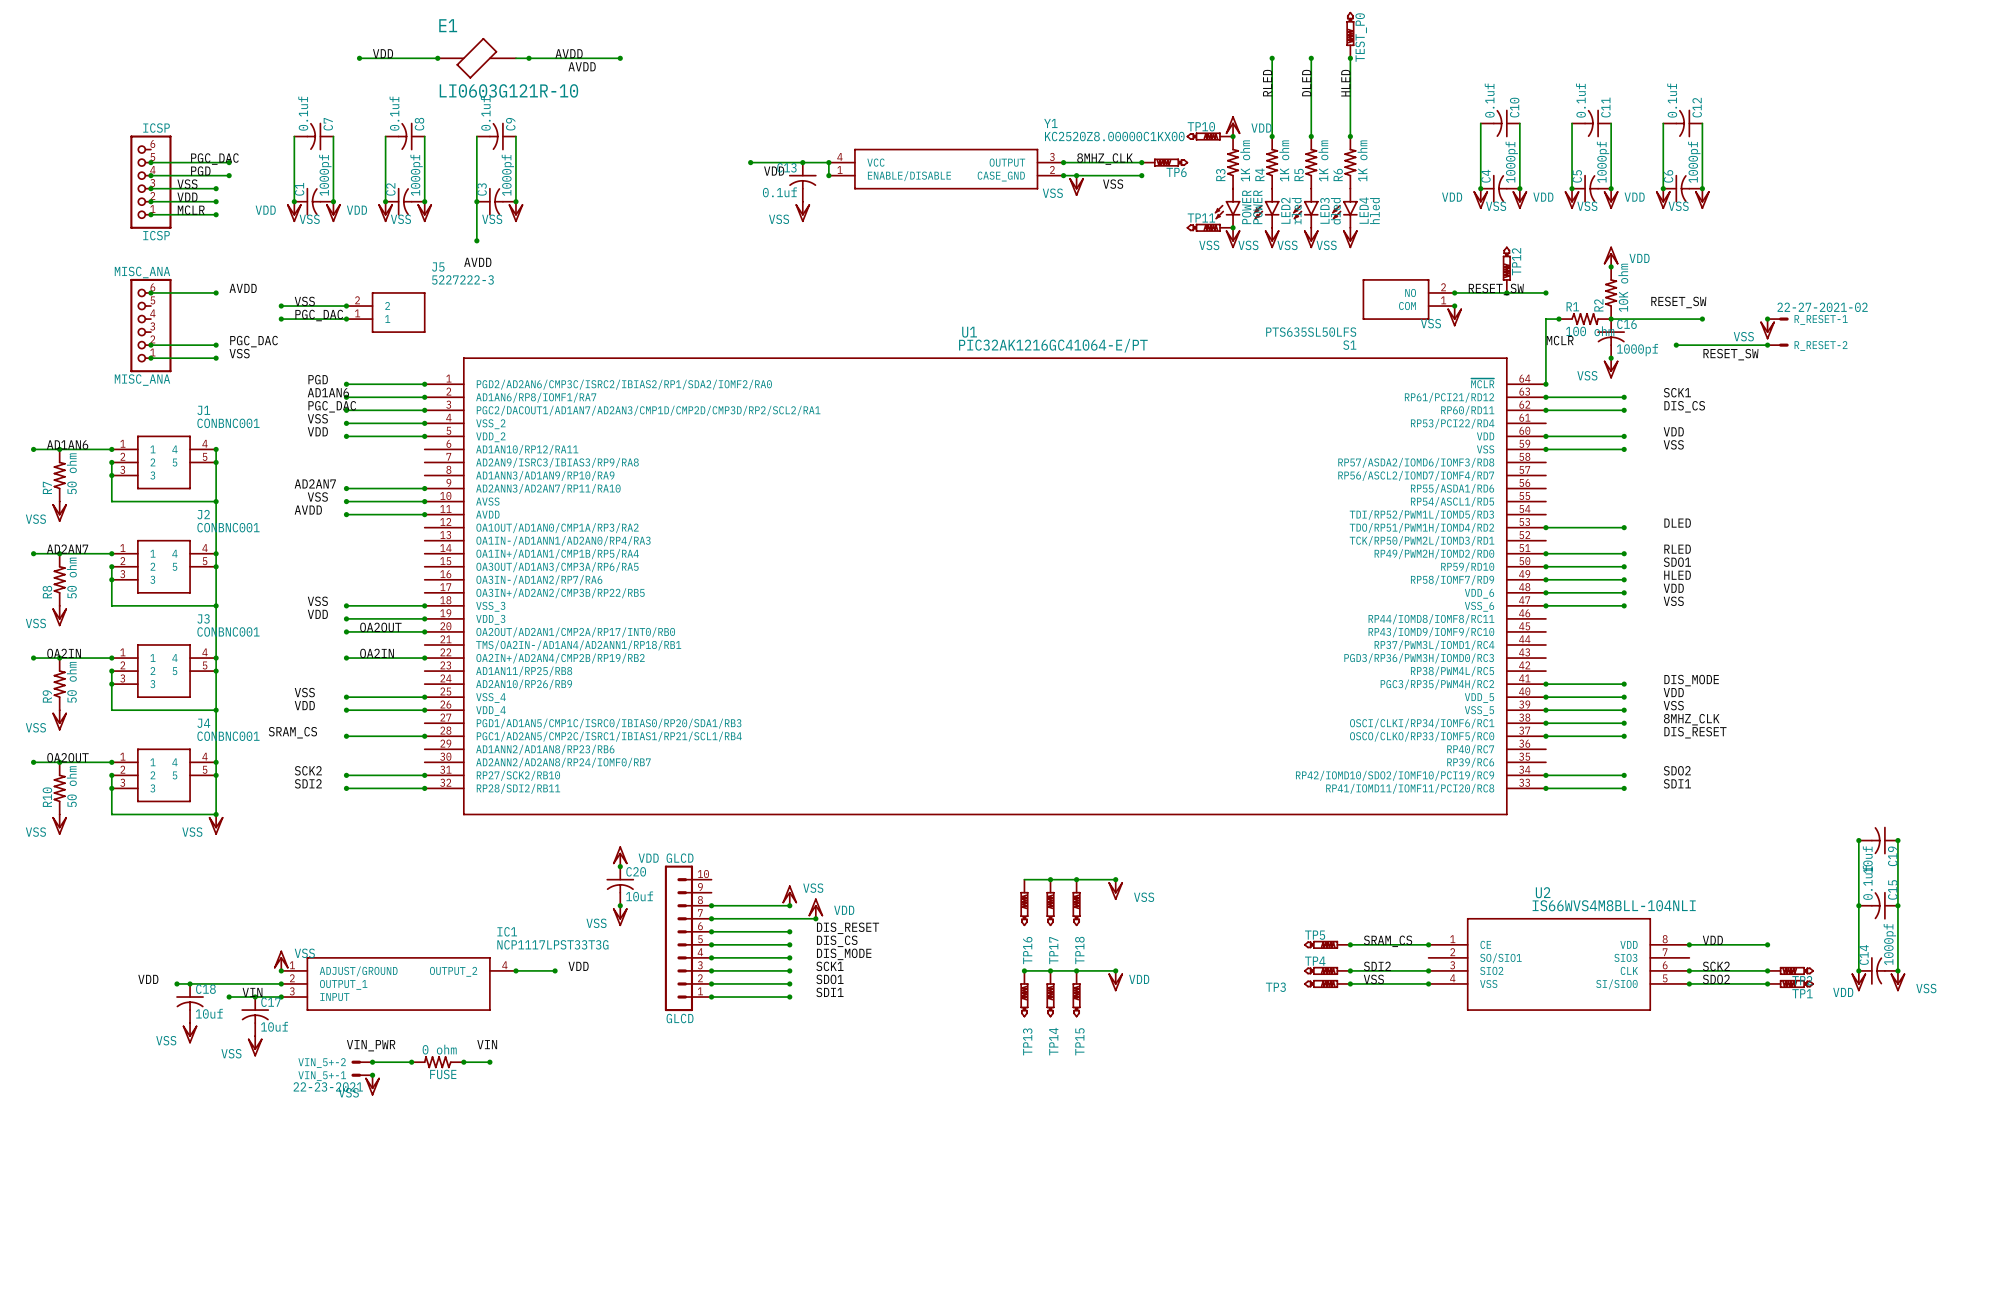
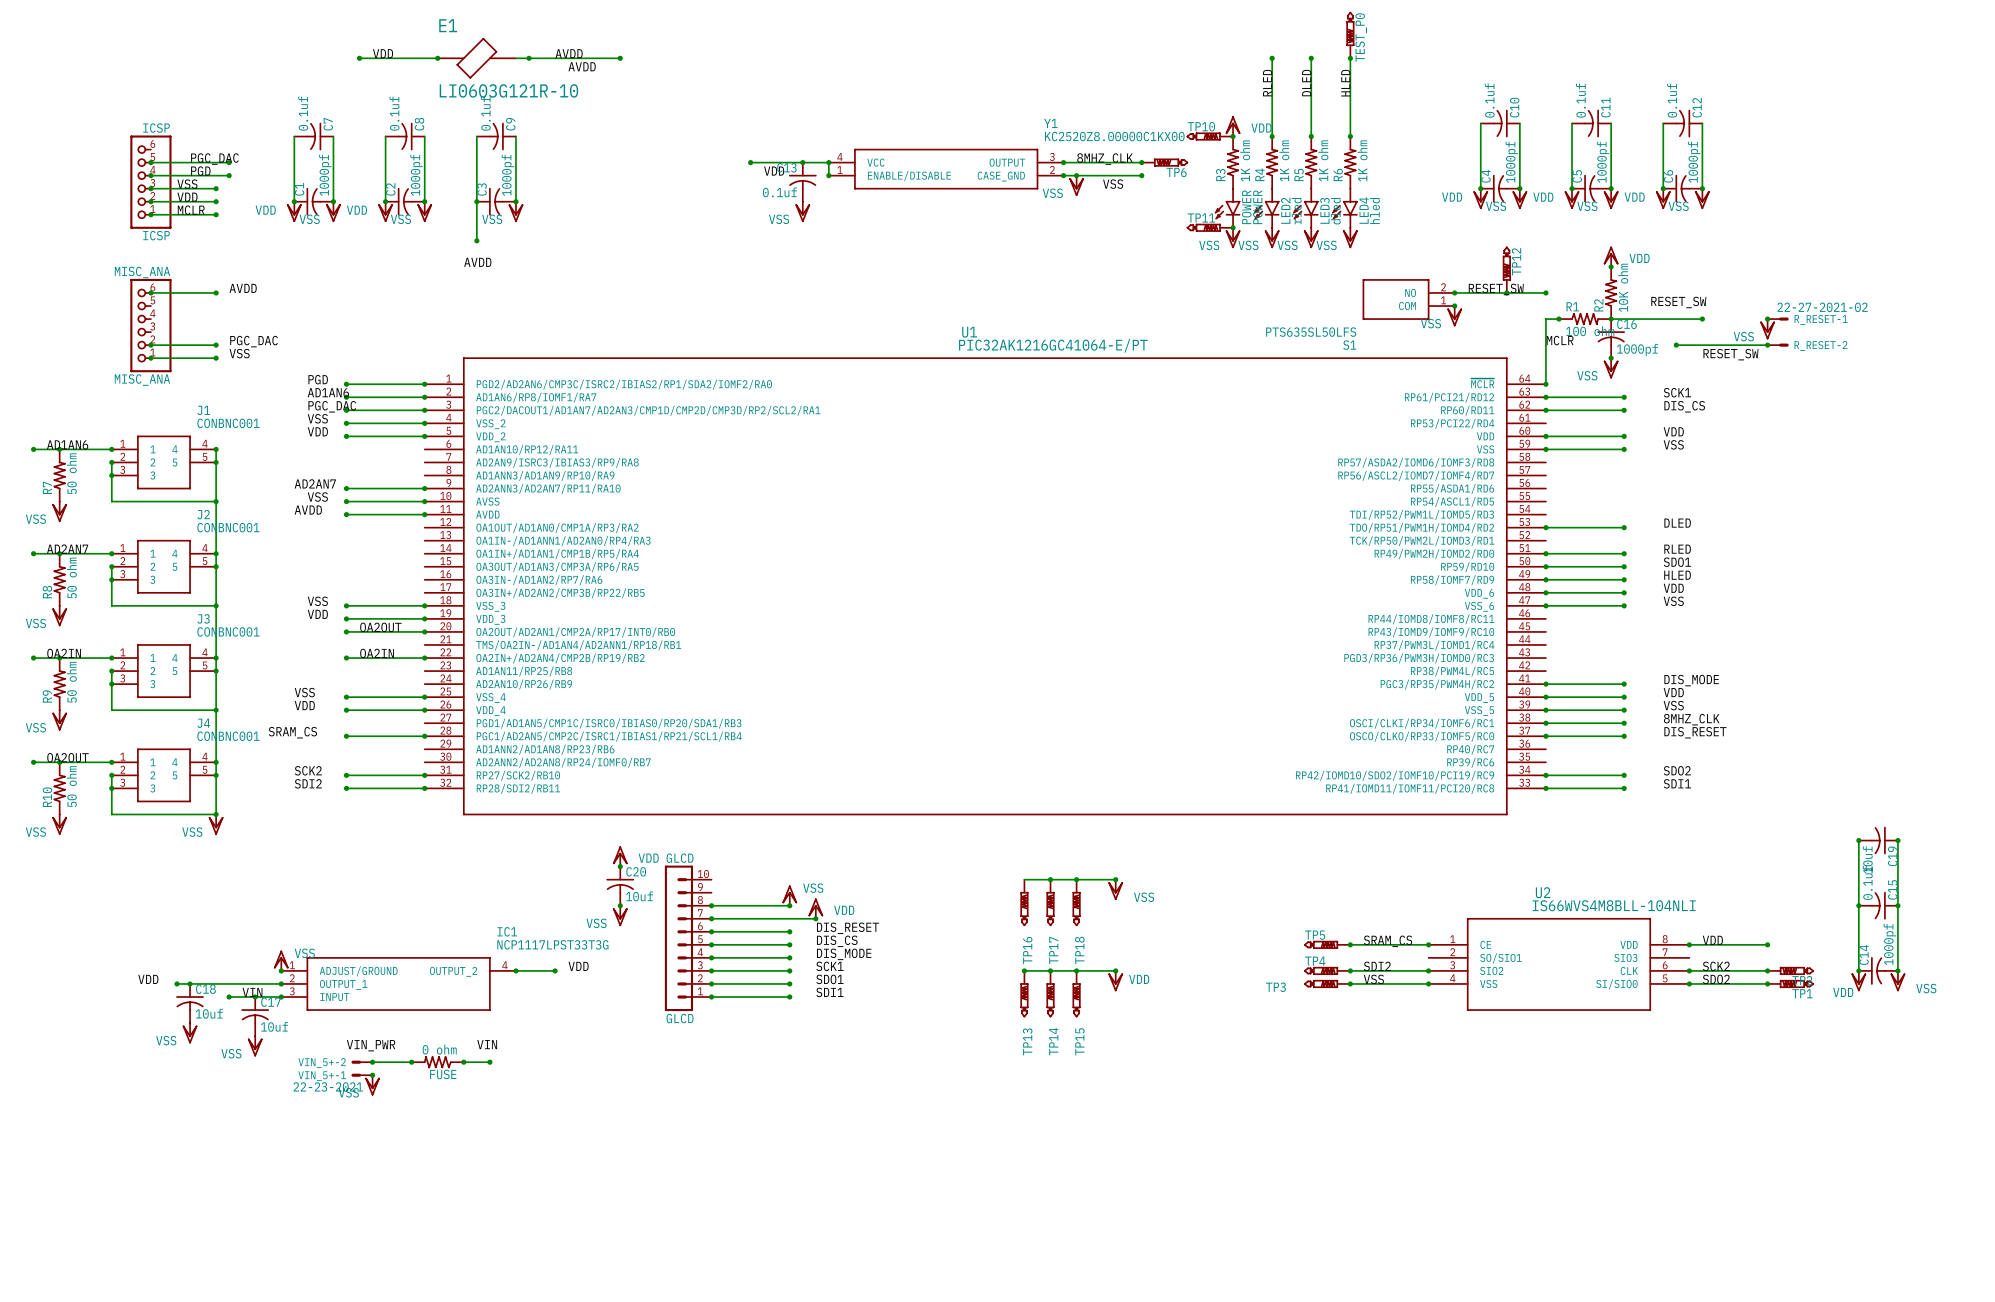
label: VSS (304, 301) -> none
wire: (281, 306) (346, 306) -> none
junction: (281, 306) -> none
junction: (346, 306) -> none
J5: 5227222-3 (385, 312) -> none
label: PGC_DAC (319, 315) -> none
wire: (281, 319) (346, 319) -> none
junction: (281, 319) -> none
junction: (346, 319) -> none

